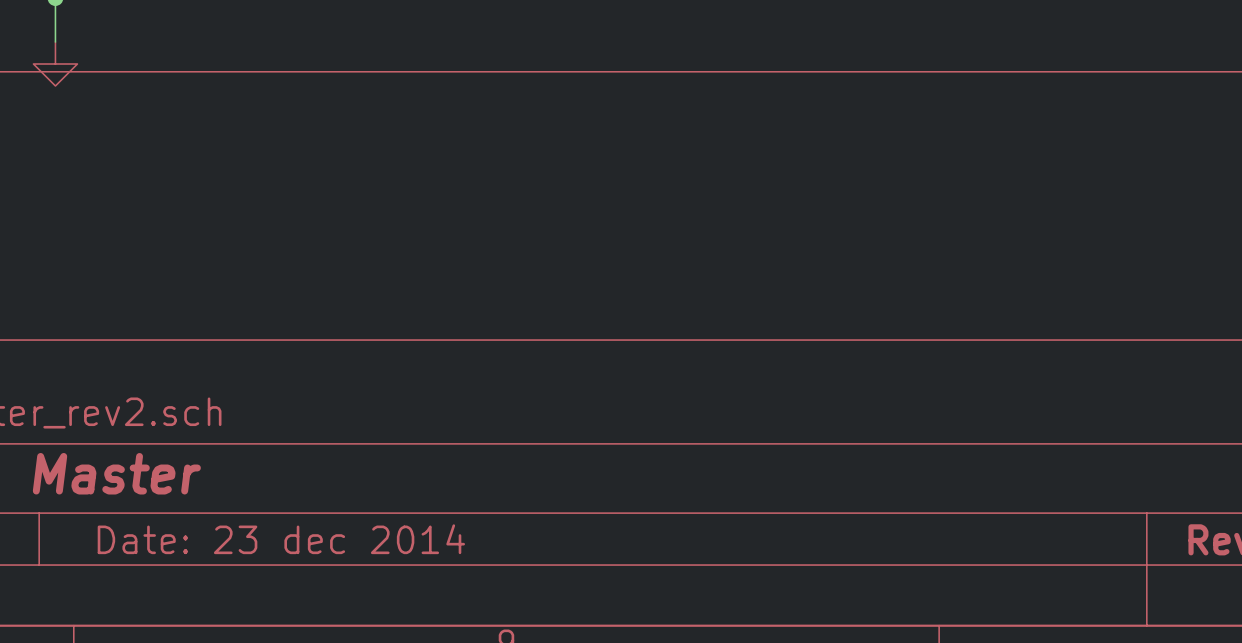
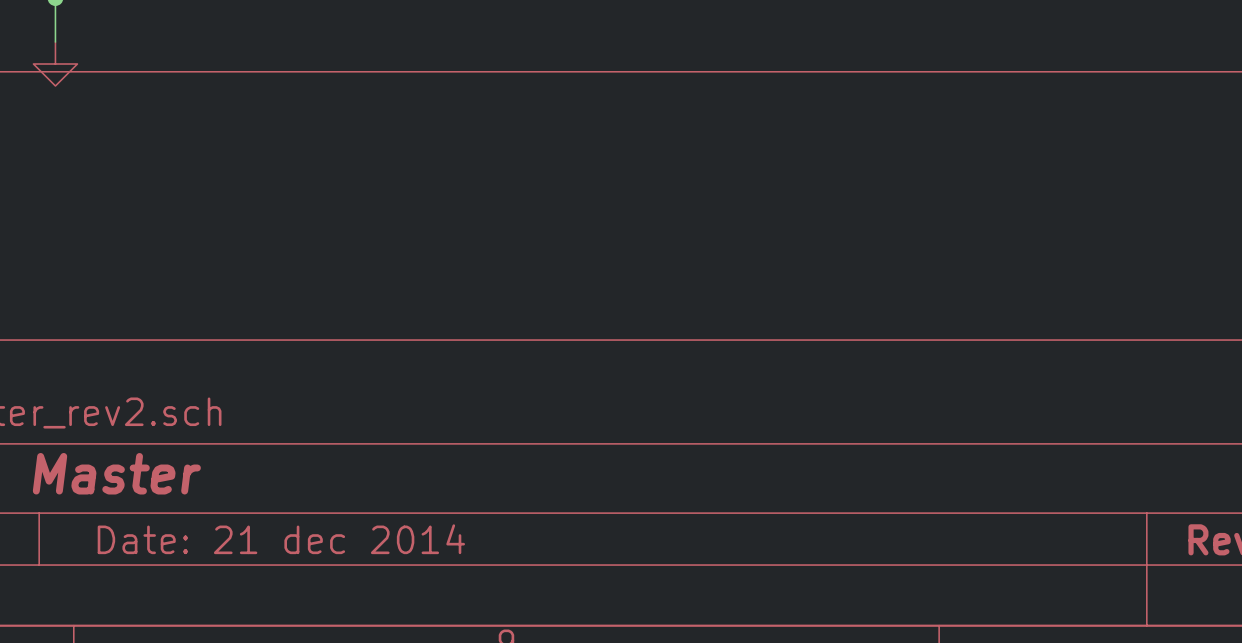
title block: Date: 23 dec 2014 (281, 539) -> Date: 21 dec 2014 (281, 539)

